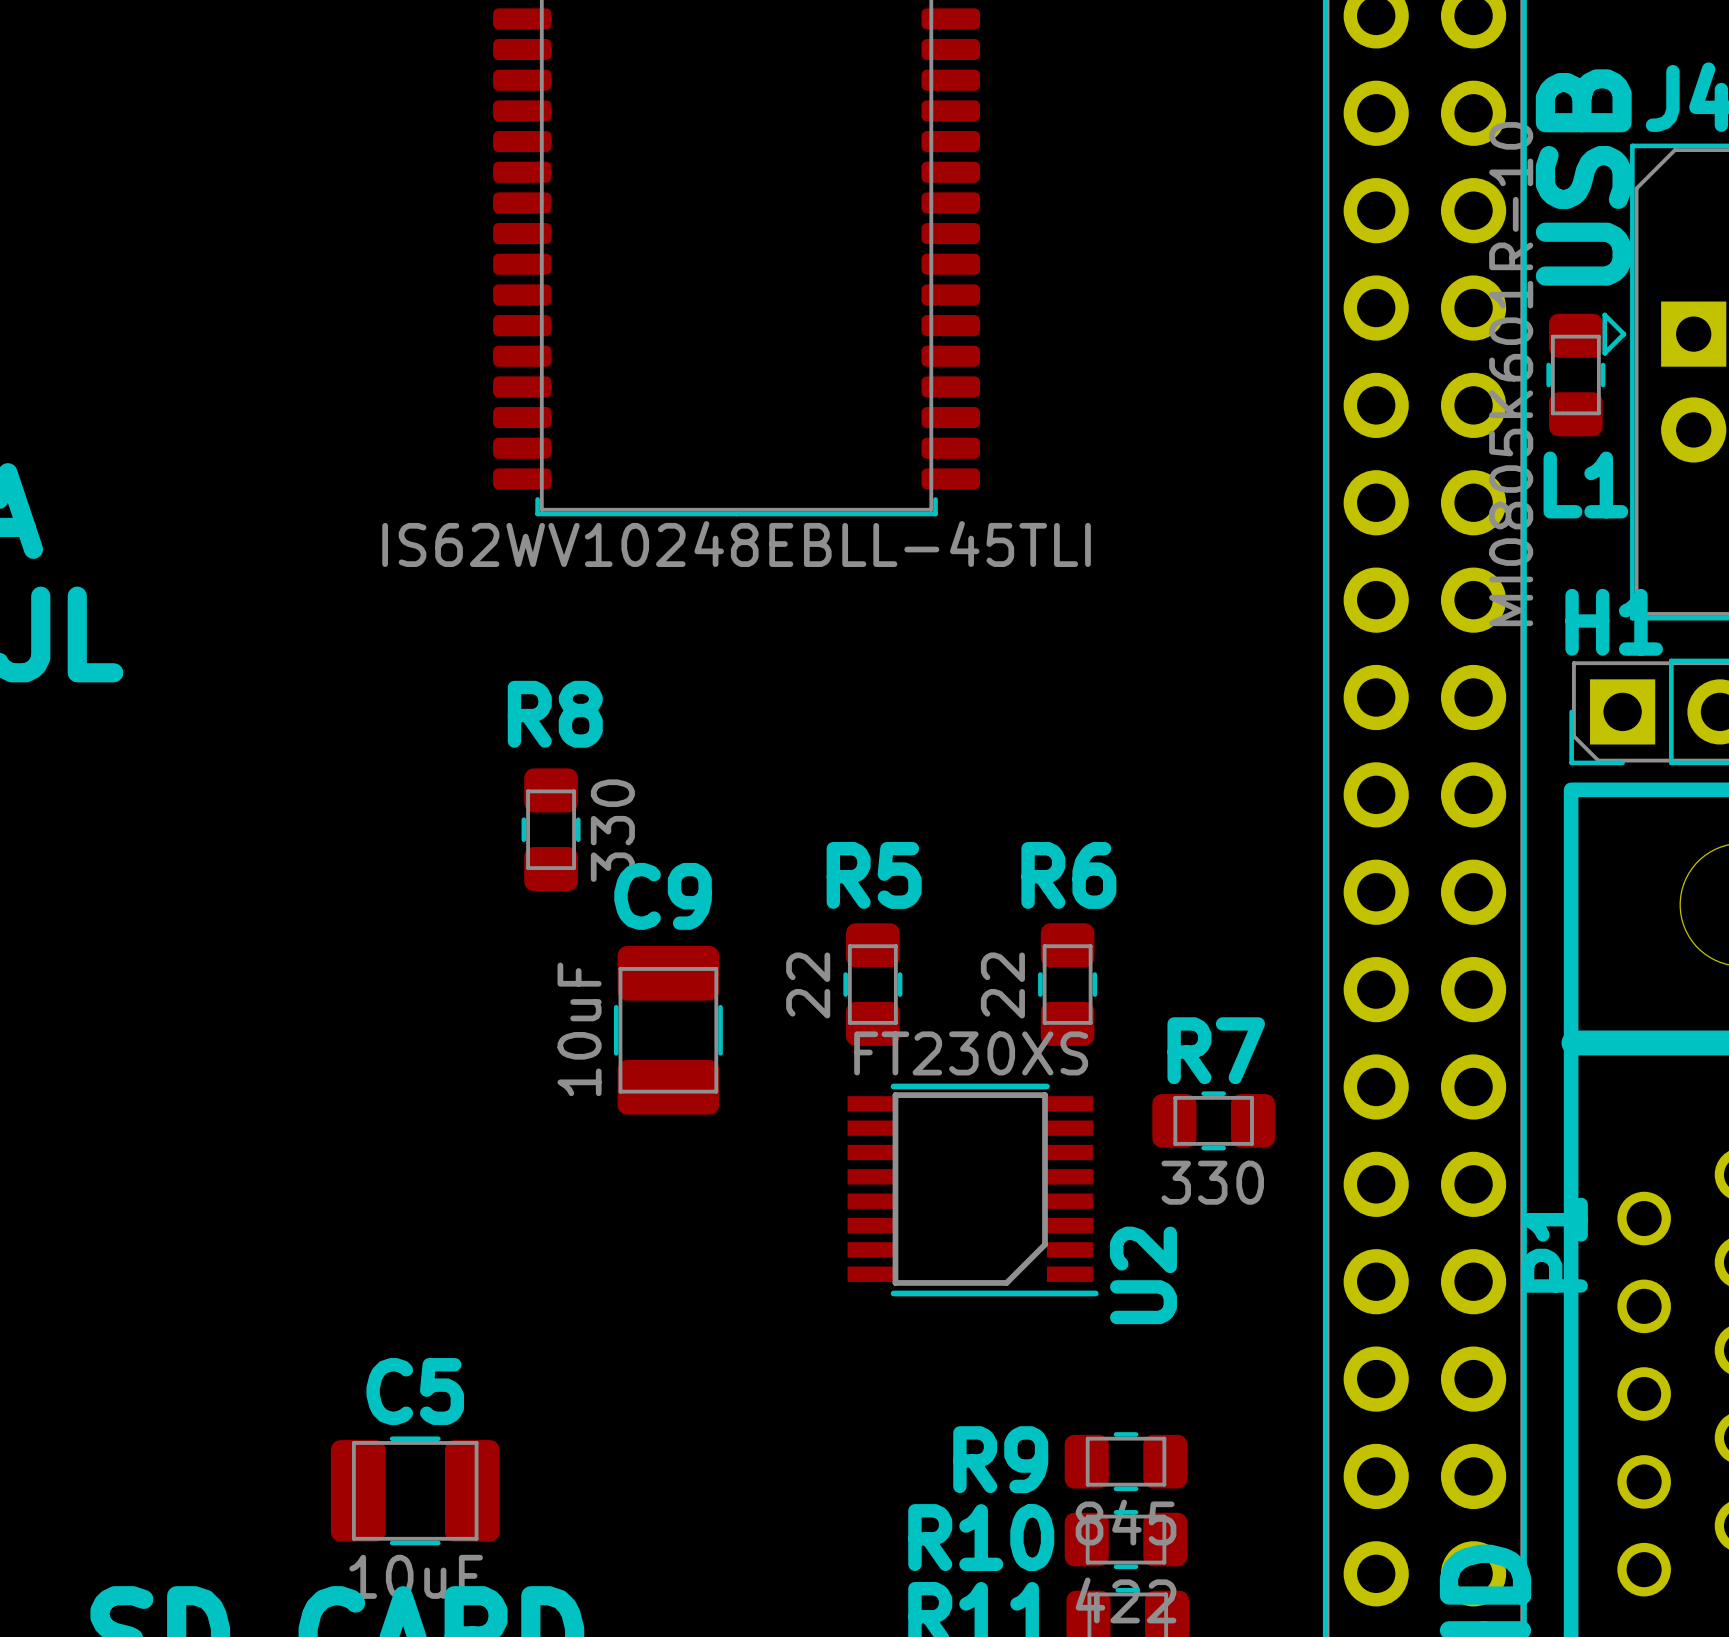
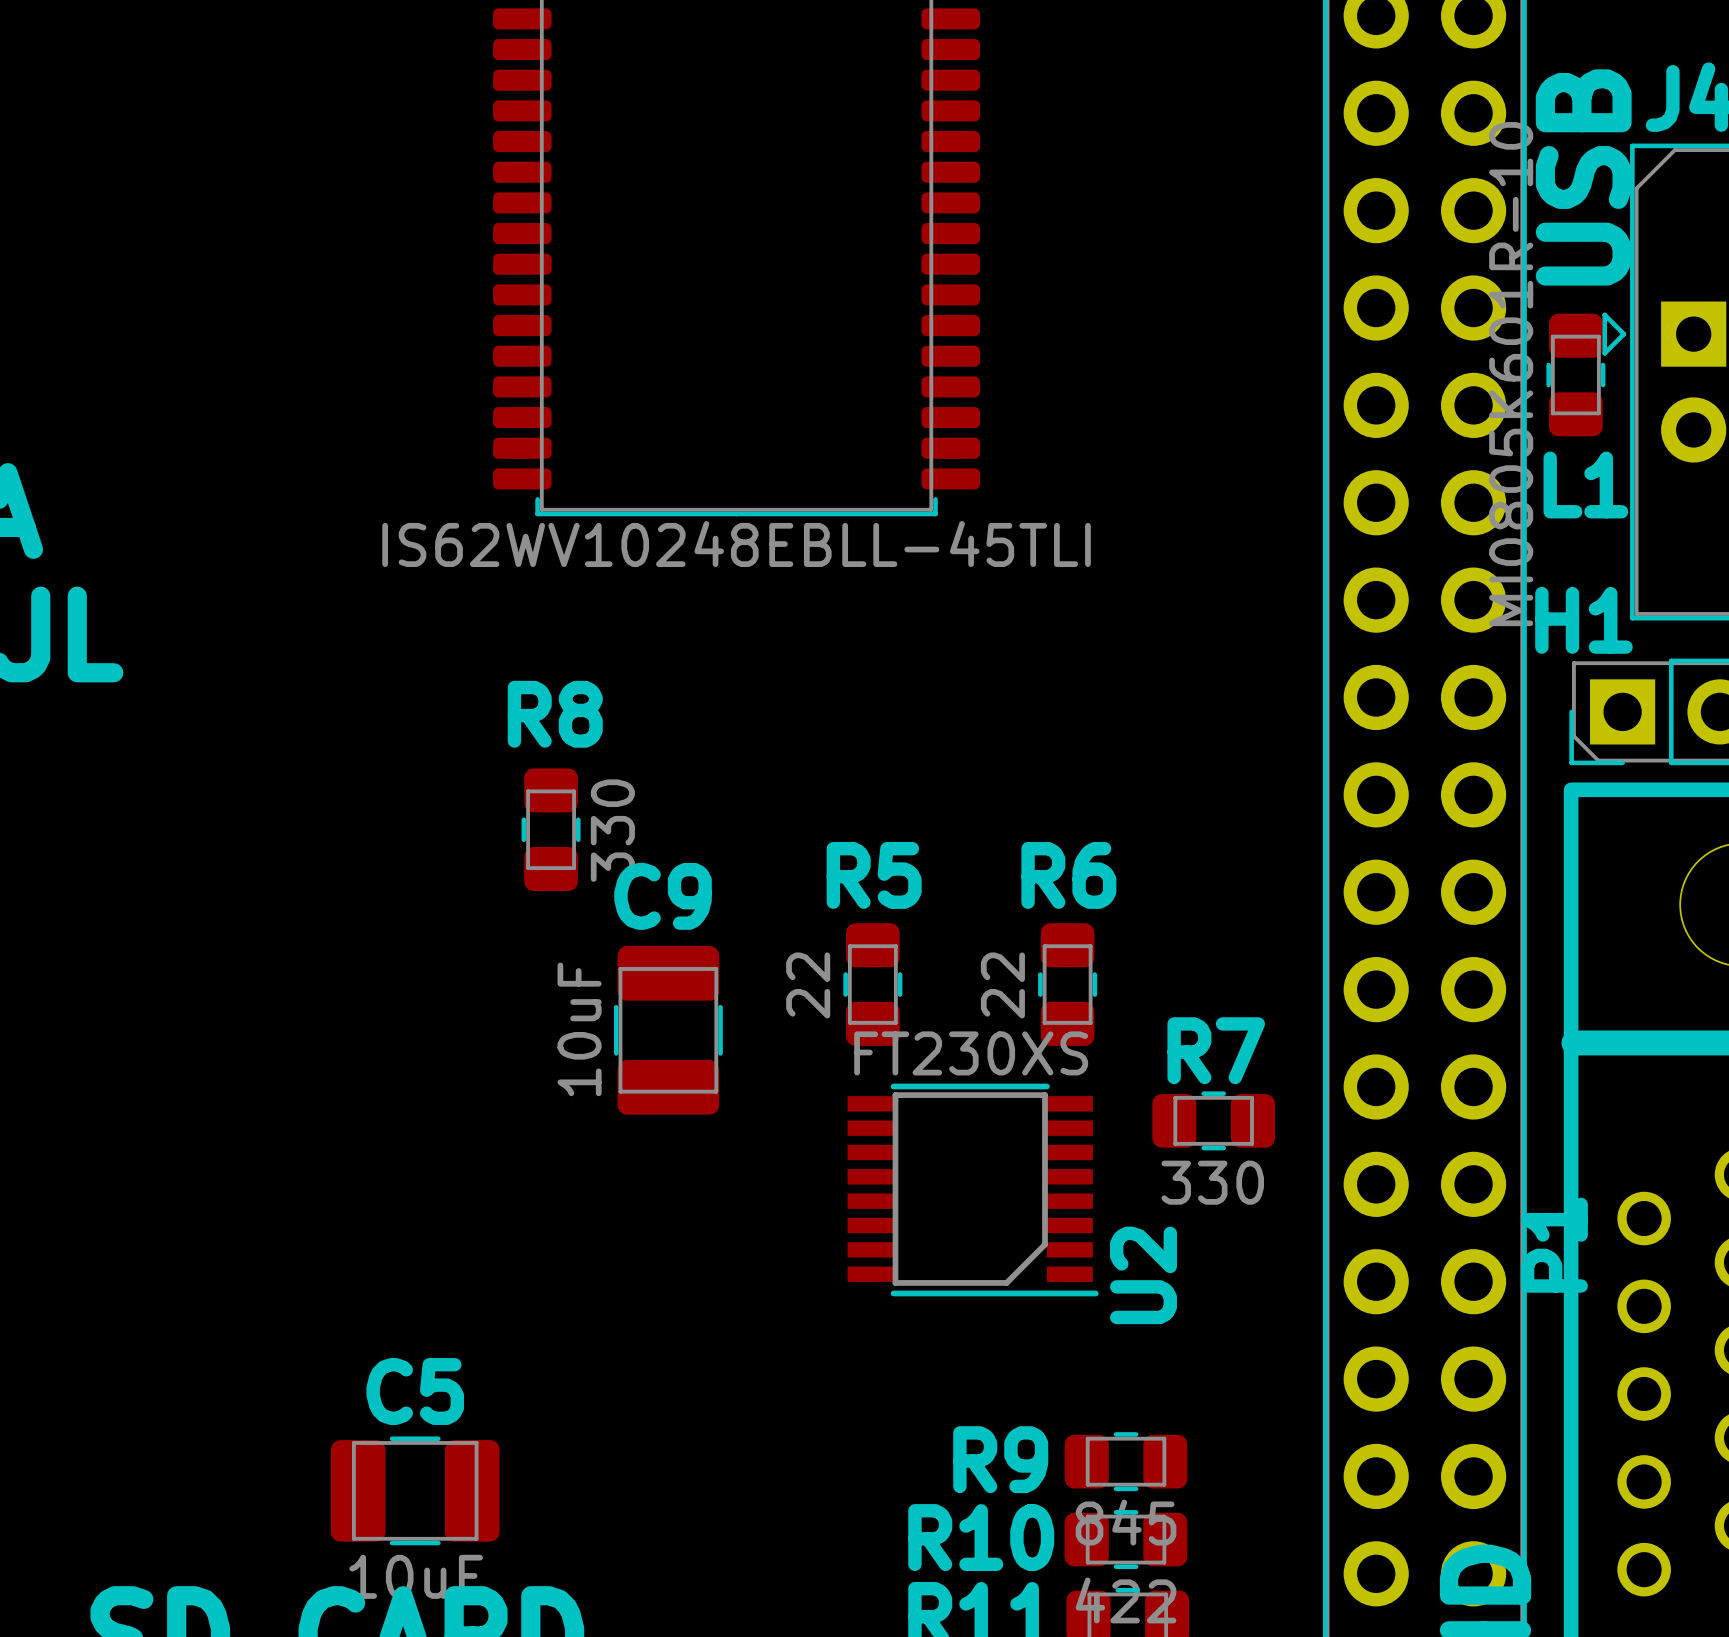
H1 name position: H1 (1614, 622) -> H1 (1583, 620)

